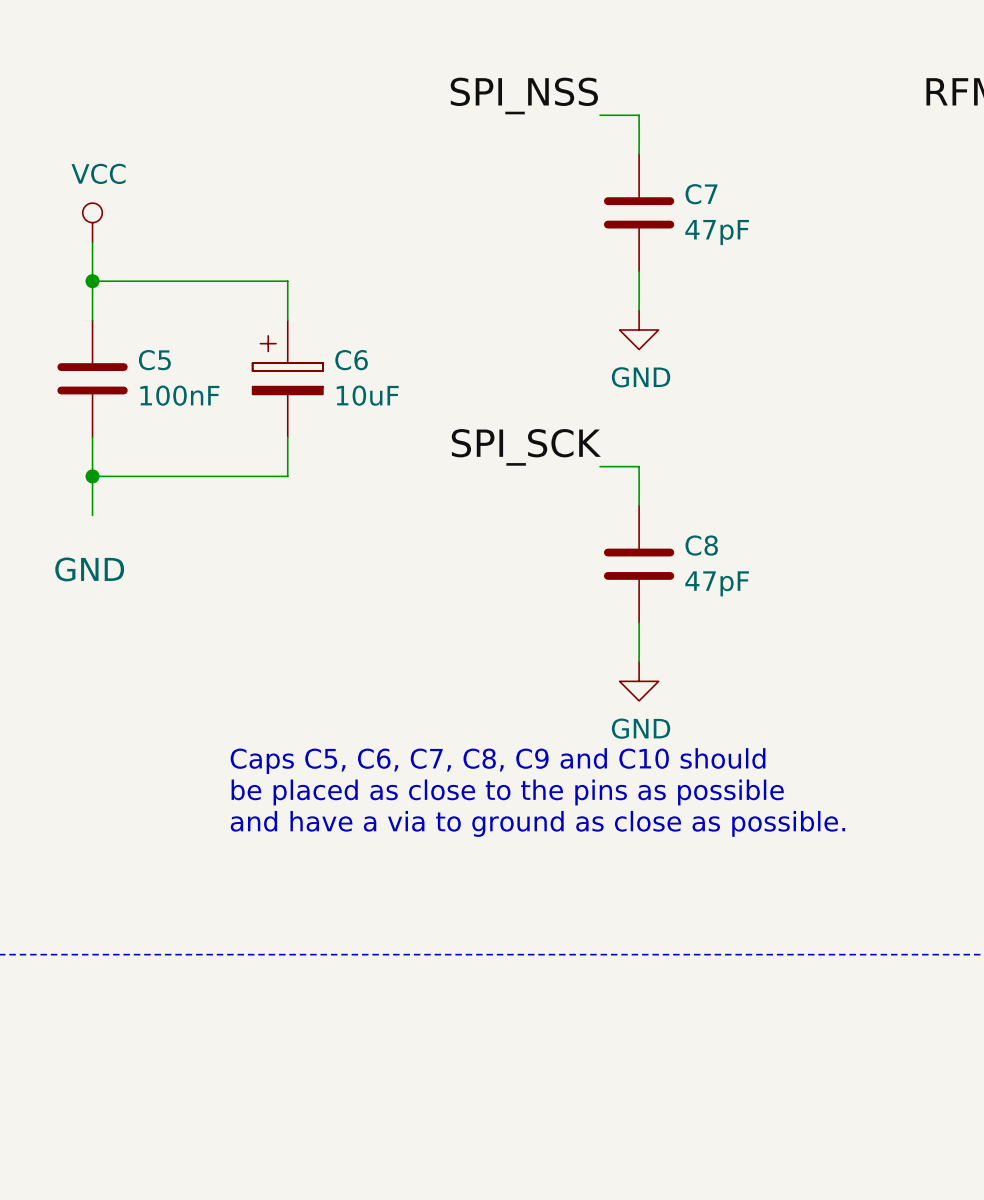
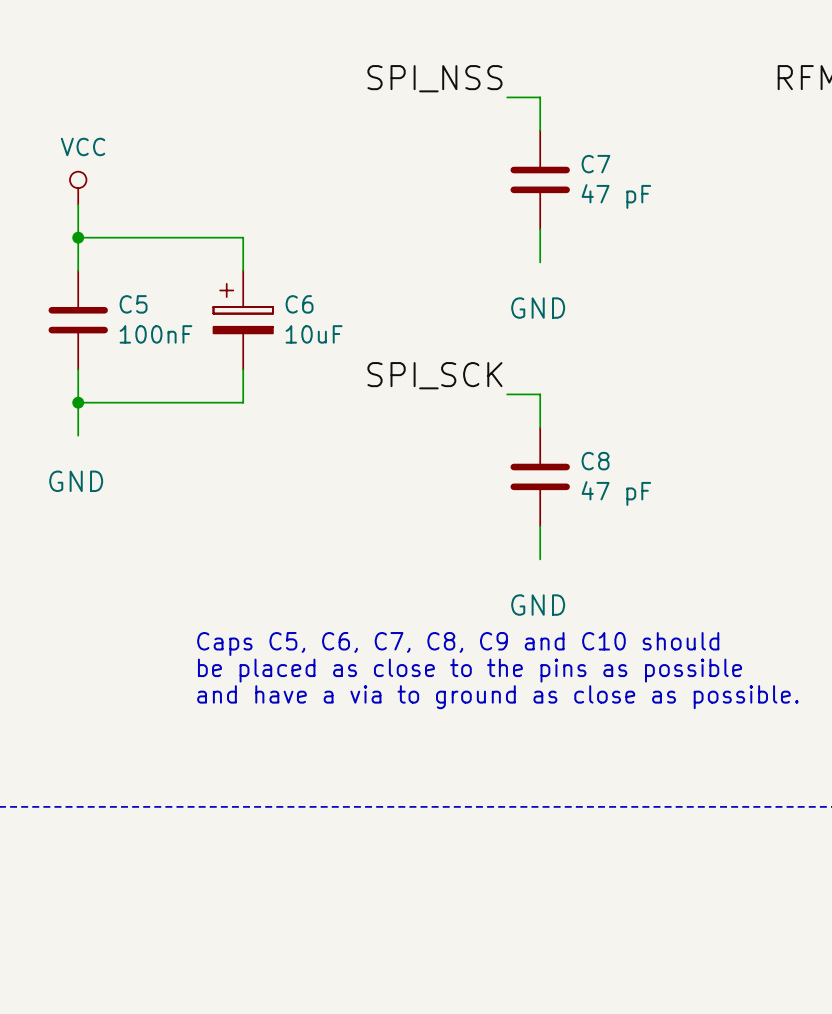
C7 value: 47pF (717, 232) -> 47 pF (616, 196)
power symbol: GND (639, 329) -> none
power symbol: none -> GND (538, 308)
C8 value: 47pF (717, 583) -> 47 pF (616, 493)
power symbol: GND (639, 681) -> none
power symbol: none -> GND (538, 605)

